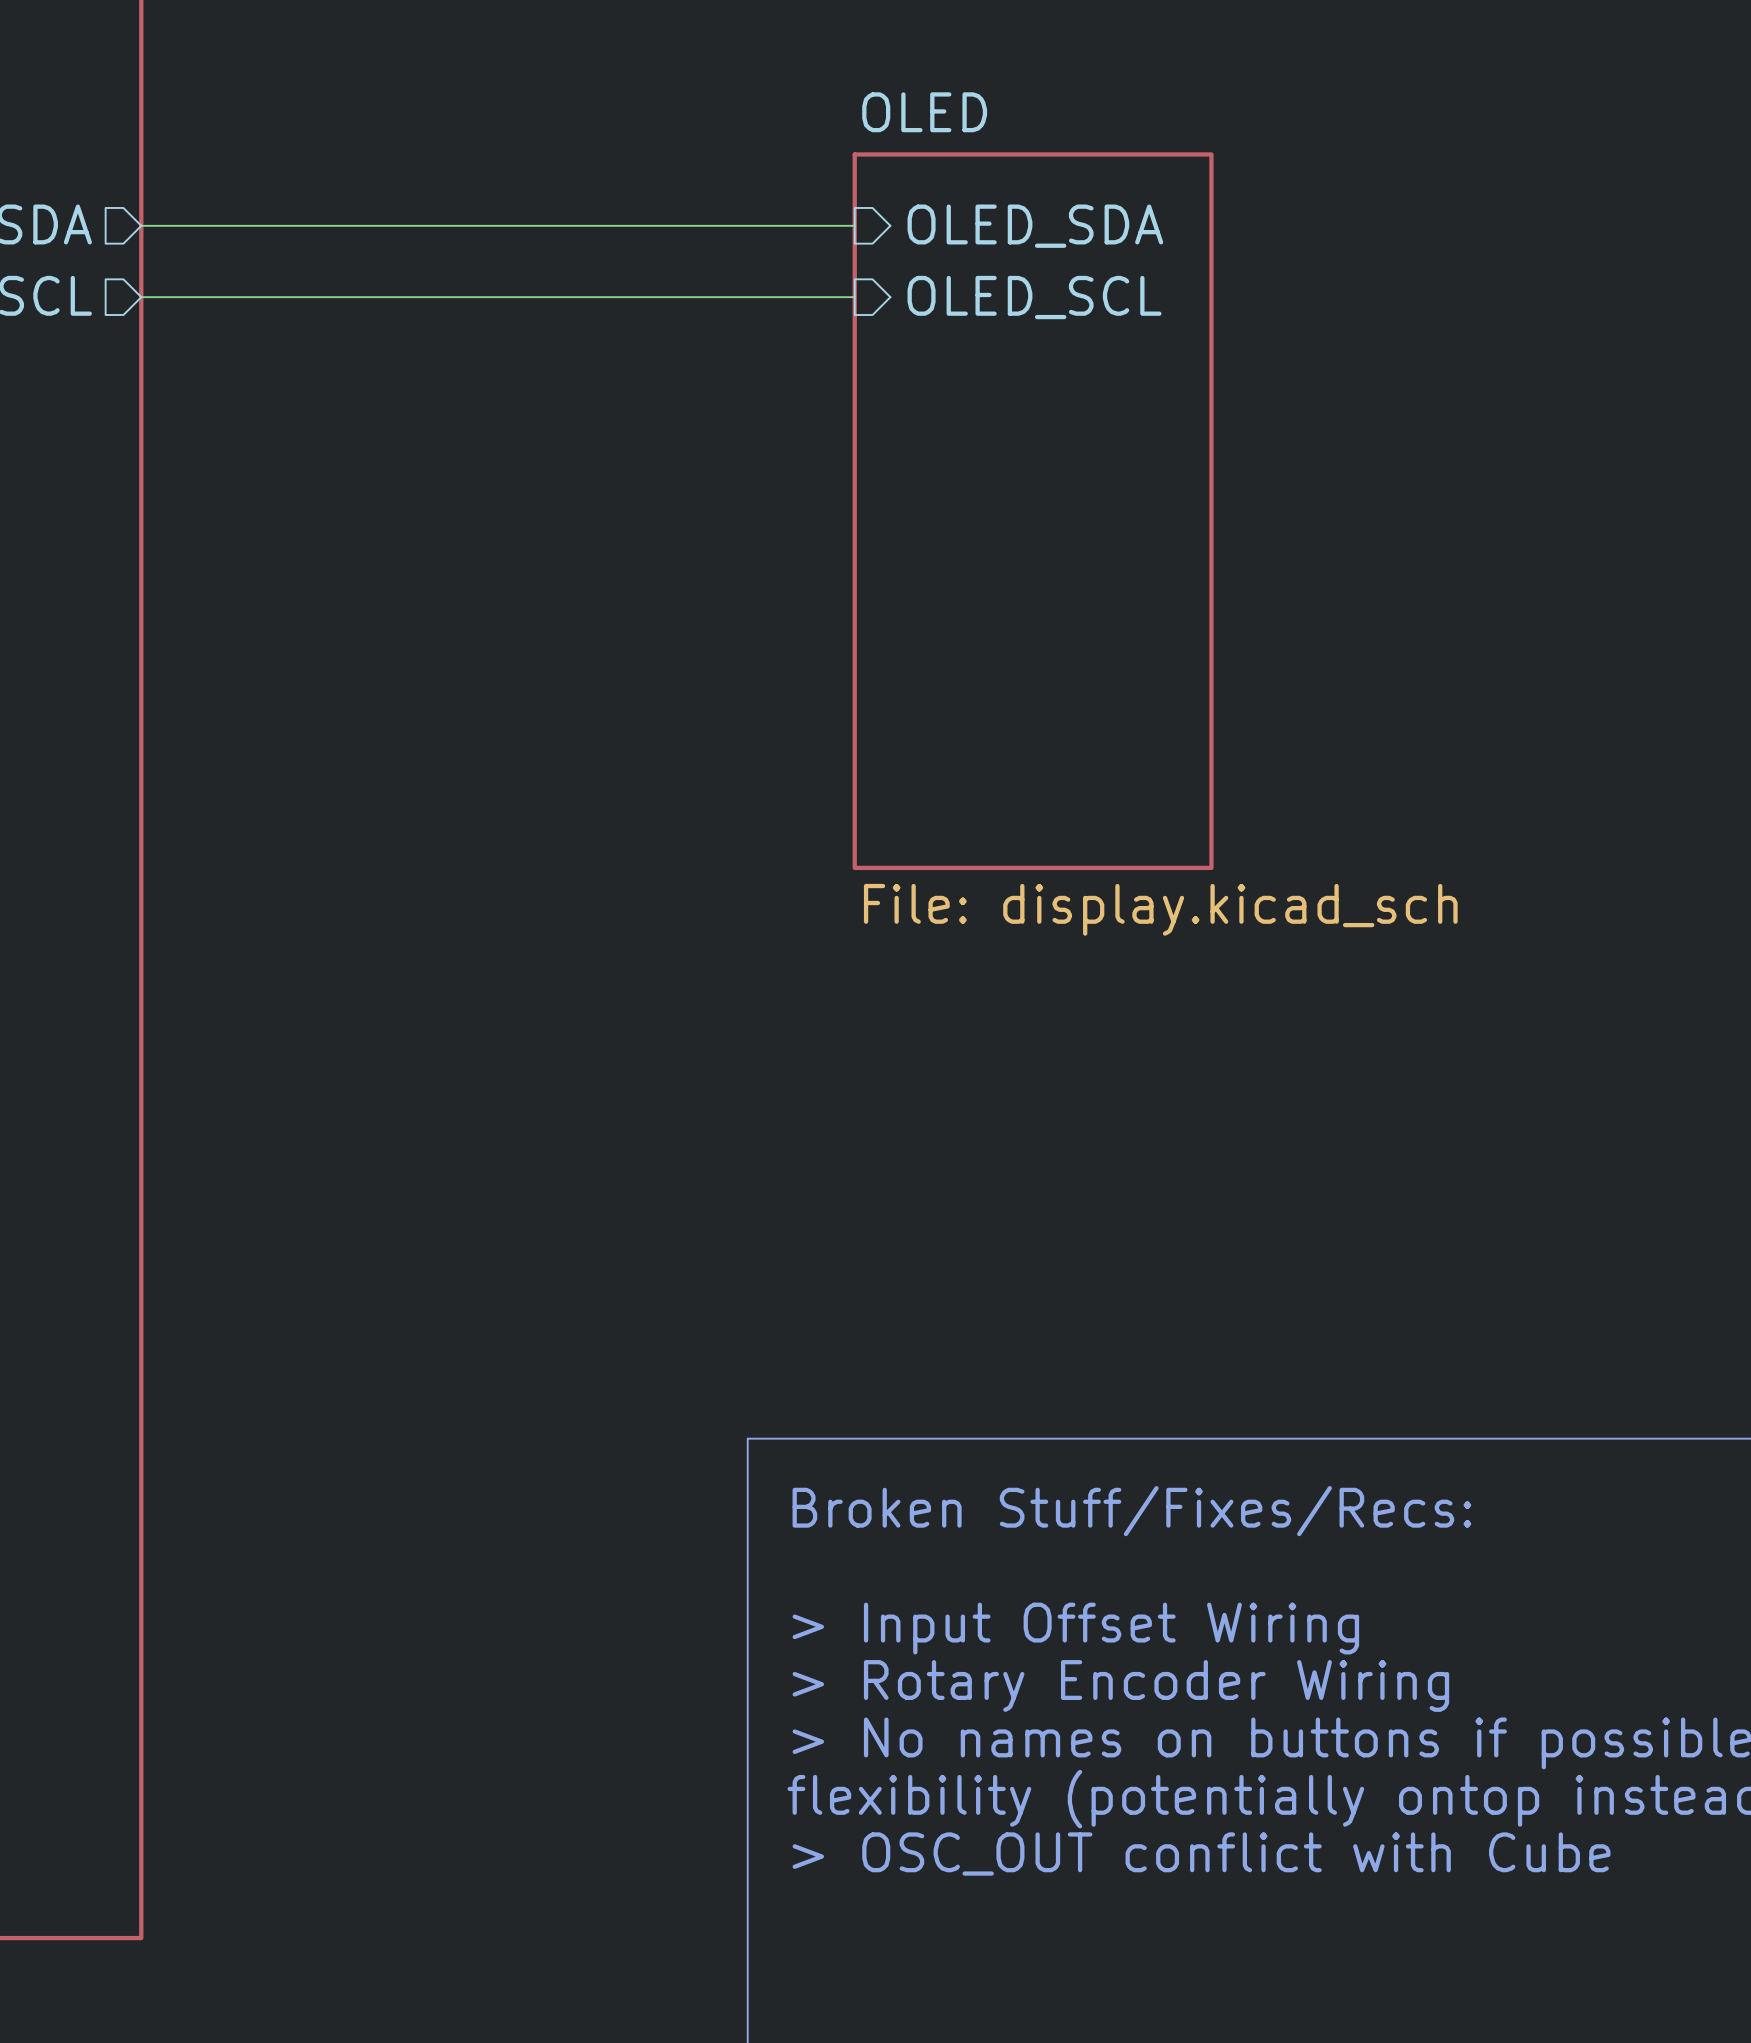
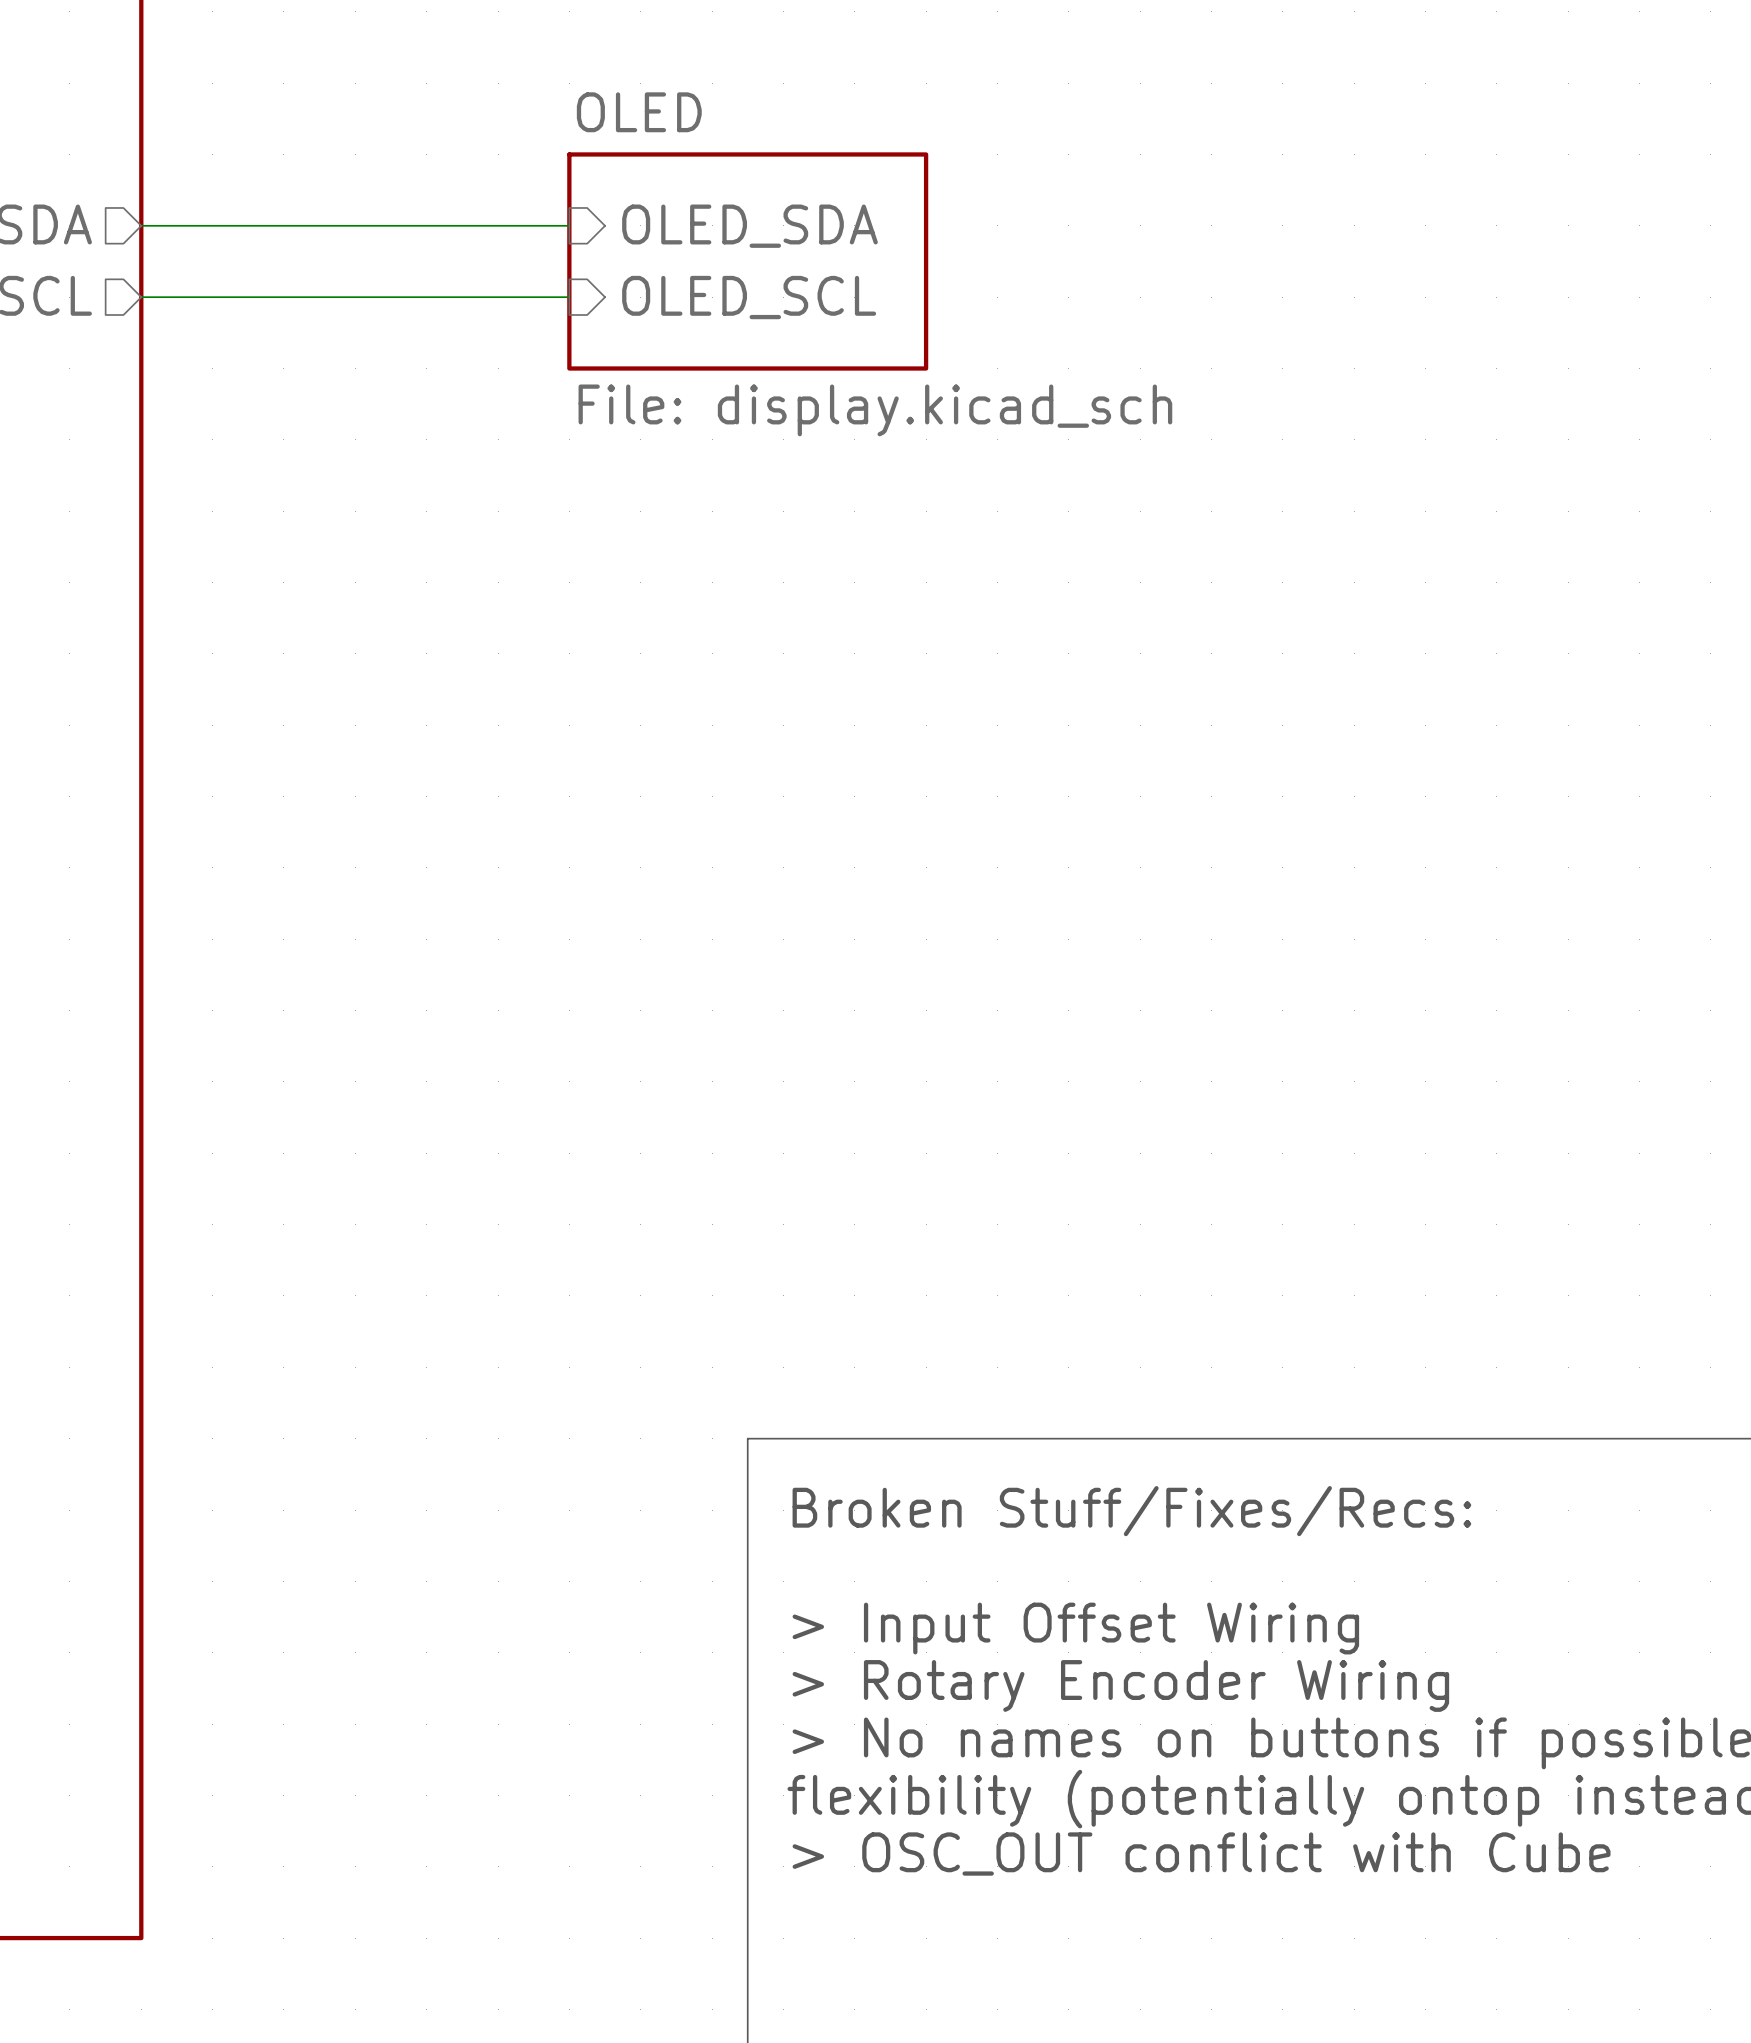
wire: (569, 225) (854, 225) -> none
sheet pin position: OLED_SDA (1035, 226) -> OLED_SDA (749, 226)
sheet OLED: none -> File: display.kicad_sch (747, 261)
wire: (569, 297) (854, 297) -> none
sheet pin position: OLED_SCL (1034, 297) -> OLED_SCL (749, 297)
sheet OLED: File: display.kicad_sch (1033, 511) -> none

